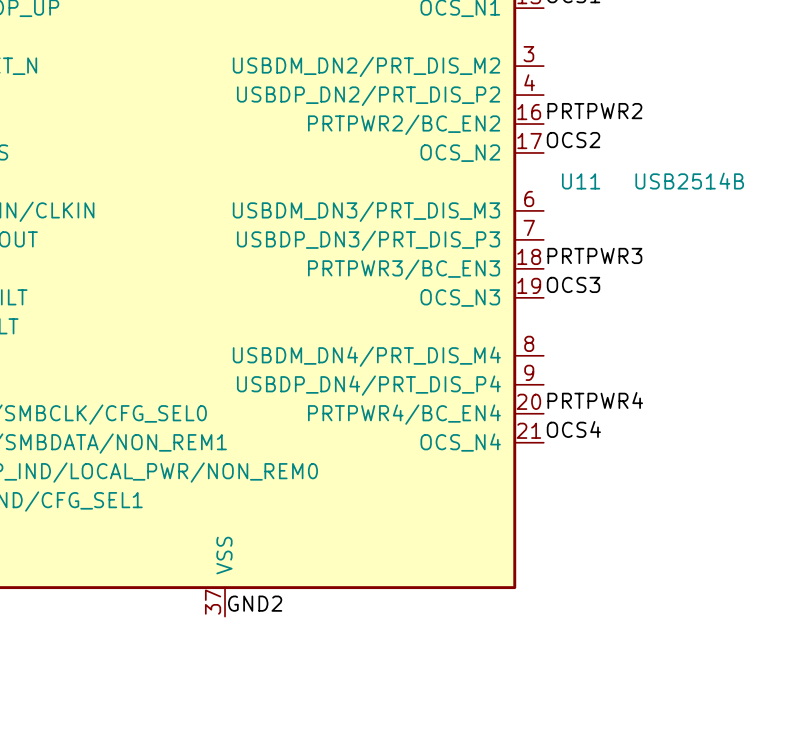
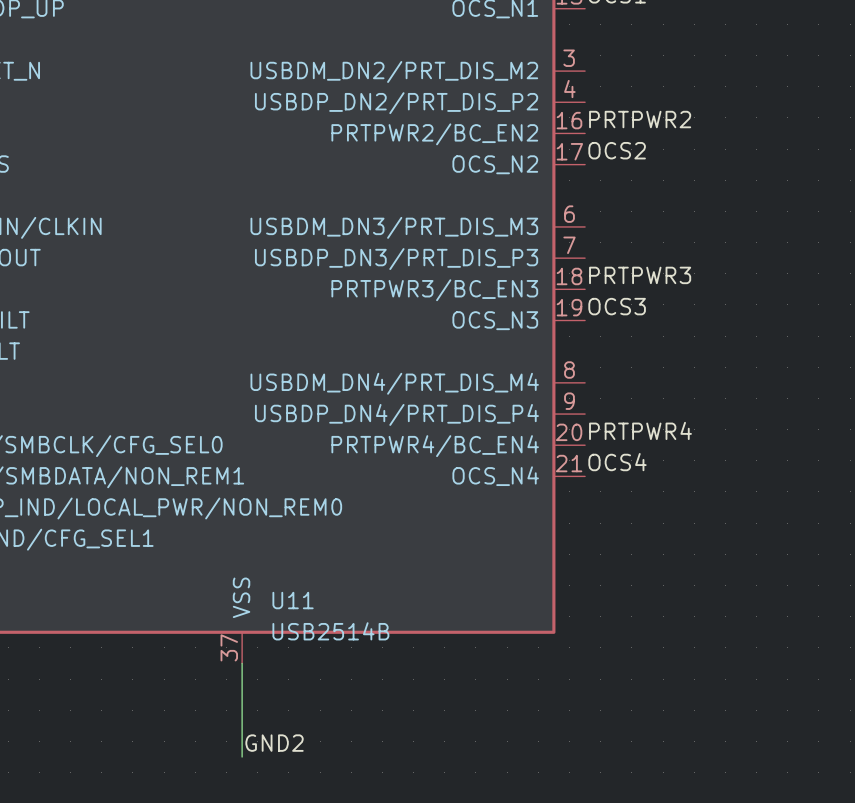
U11 name position: U11 (581, 181) -> U11 (293, 600)
U11 value position: USB2514B (689, 181) -> USB2514B (330, 631)
label position: GND2 (255, 603) -> GND2 (274, 743)
wire: none -> (242, 663) (242, 757)

